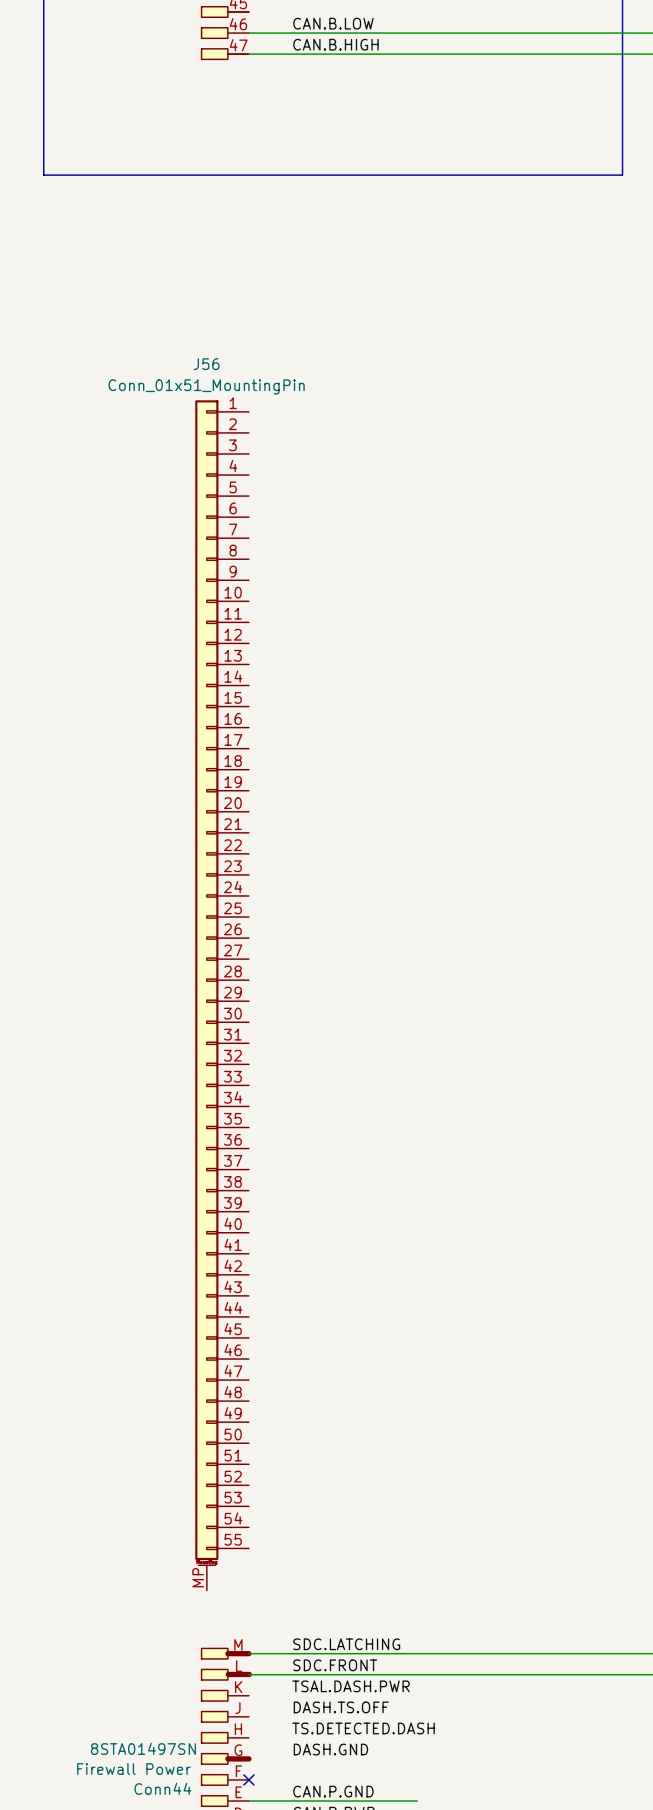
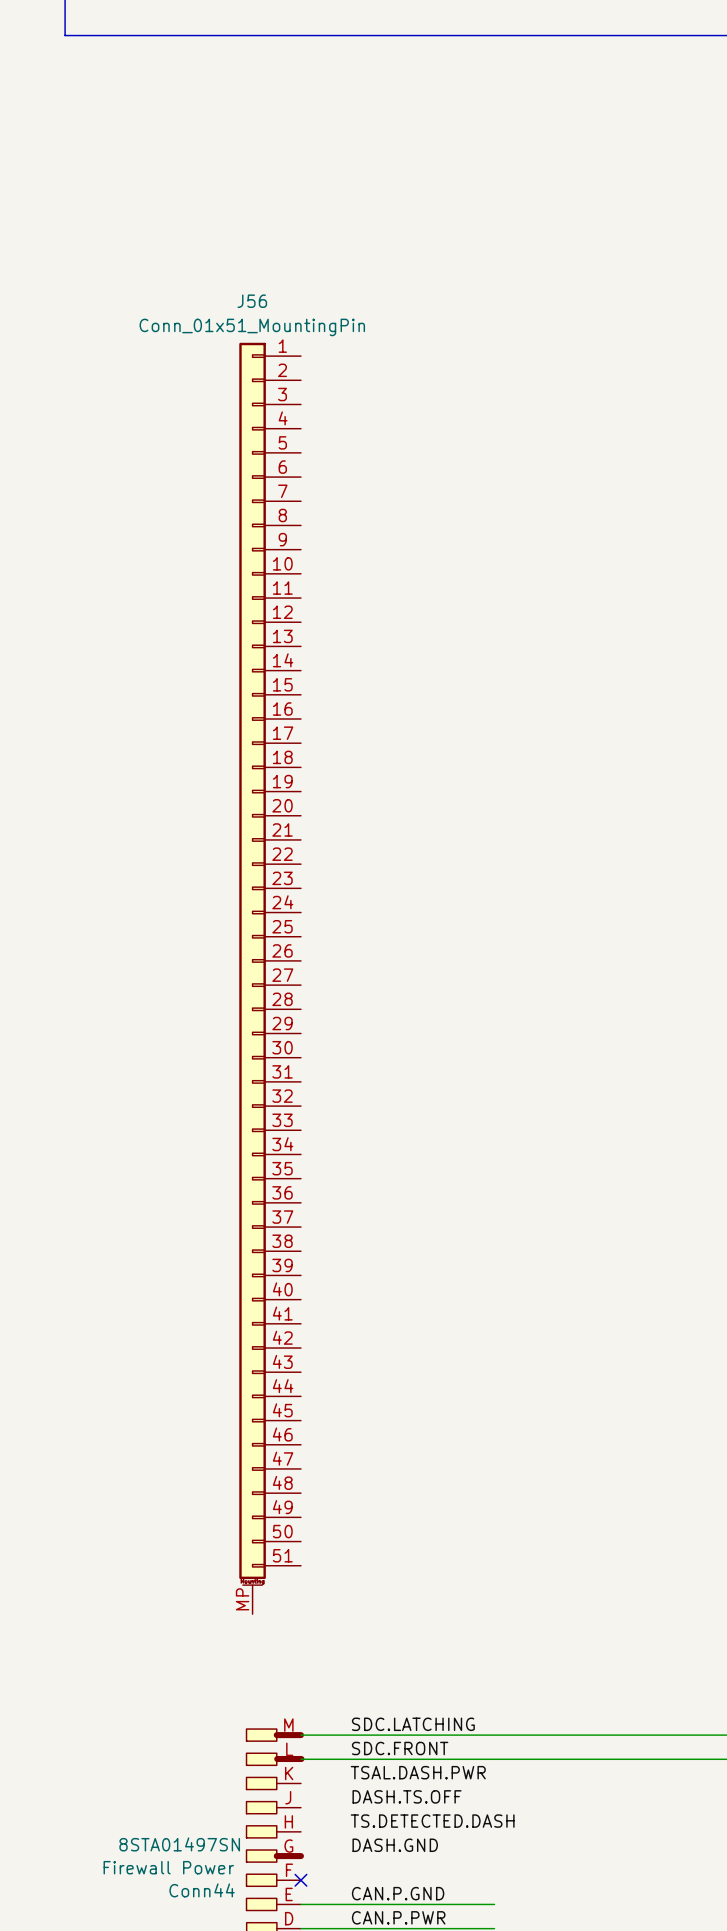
J56 name position: J56 (206, 364) -> J56 (252, 301)
J56 value position: Conn_01x51_MountingPin (206, 386) -> Conn_01x51_MountingPin (252, 327)
J56 symbol: [195, 400, 249, 1591] -> [239, 342, 301, 1615]

